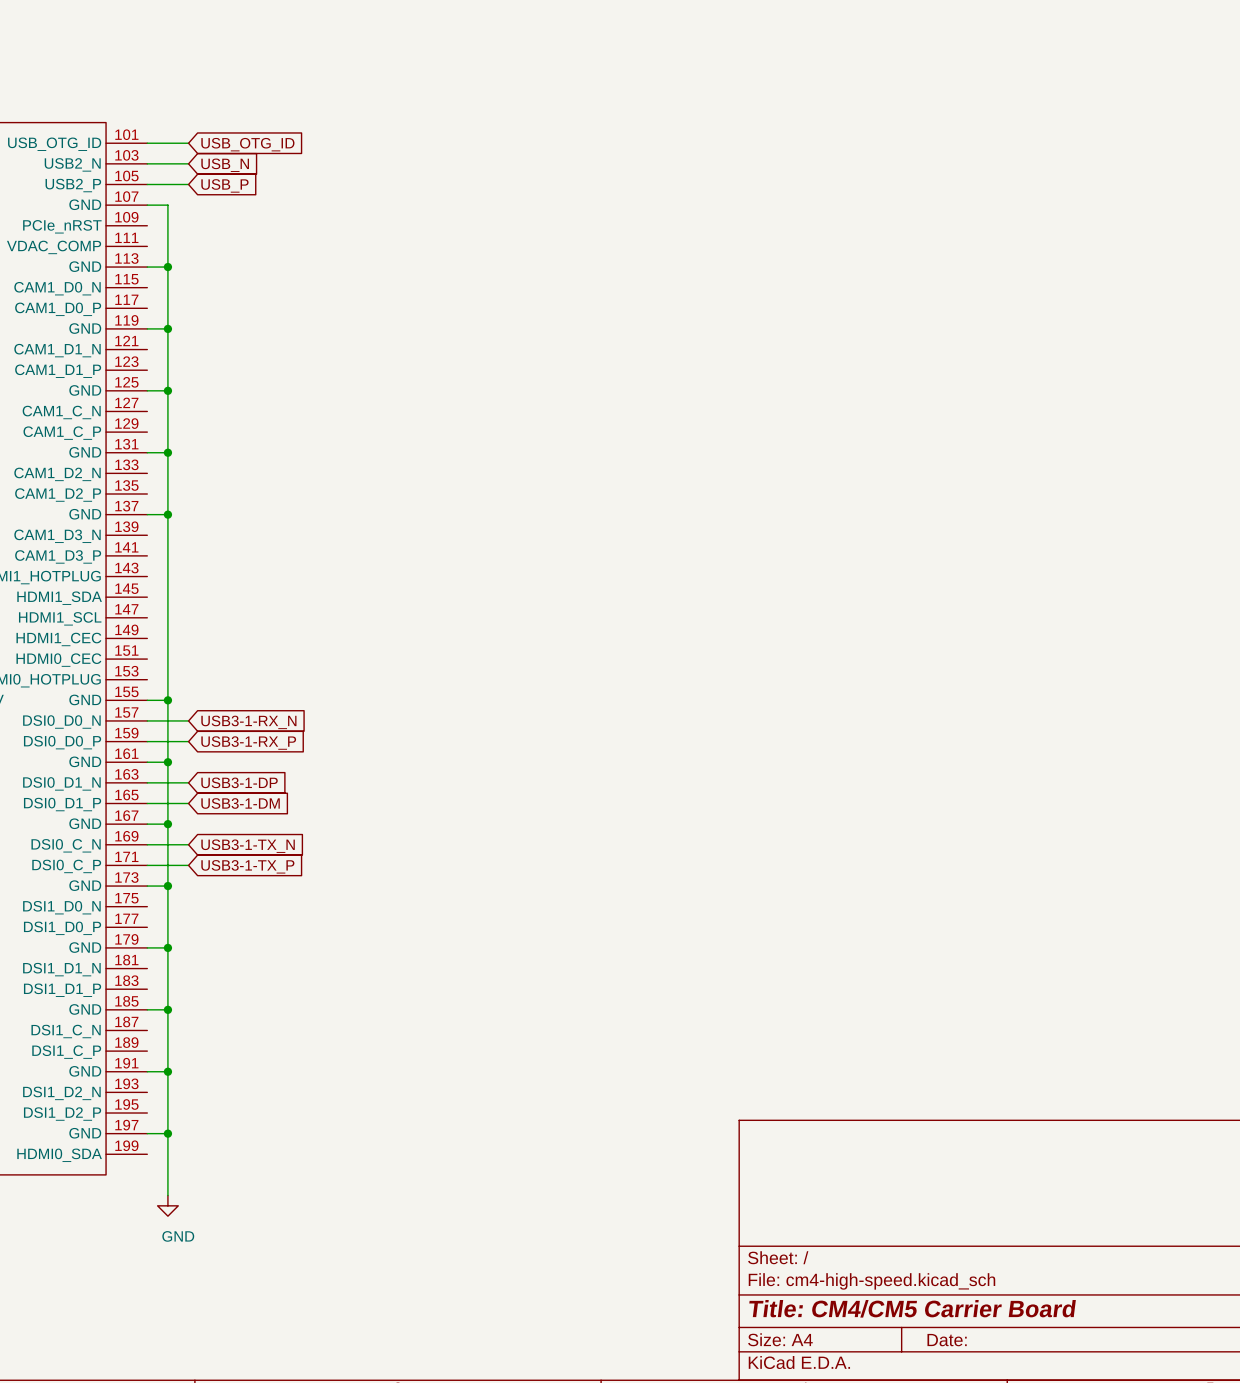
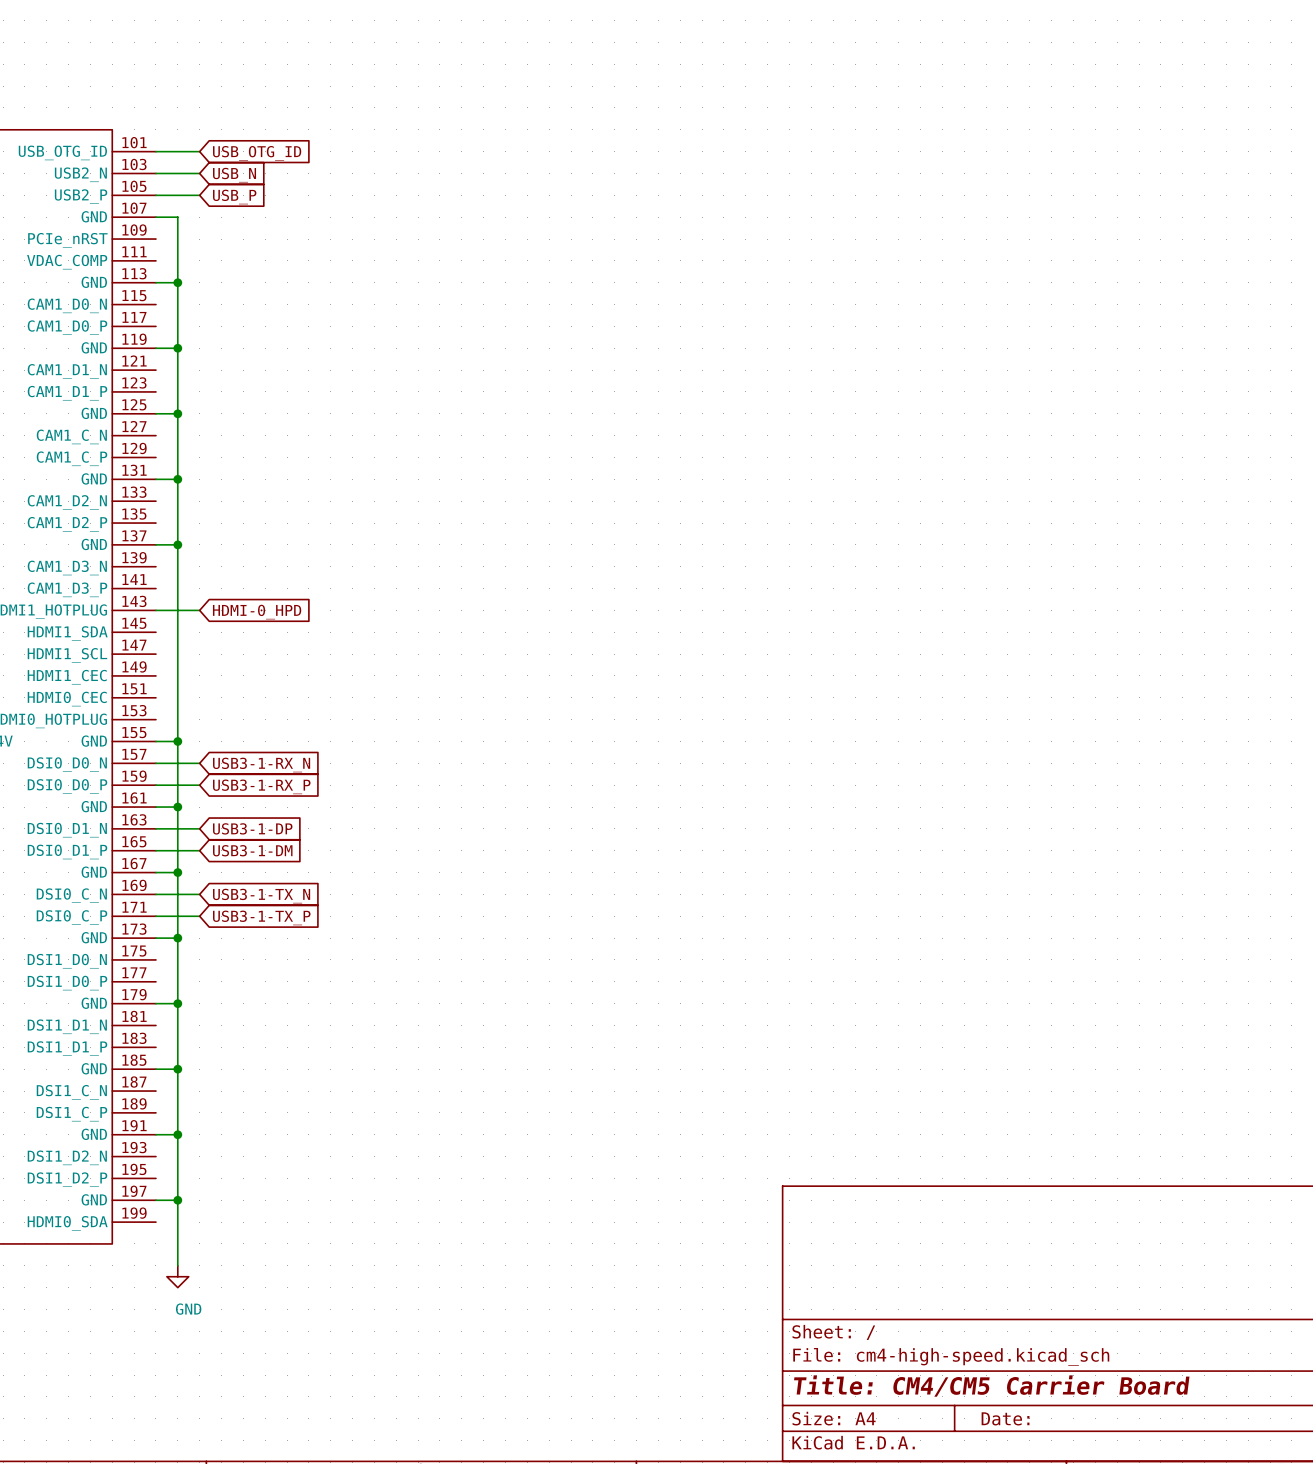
wire: none -> (155, 610) (199, 610)
global label: none -> HDMI-0_HPD (257, 612)

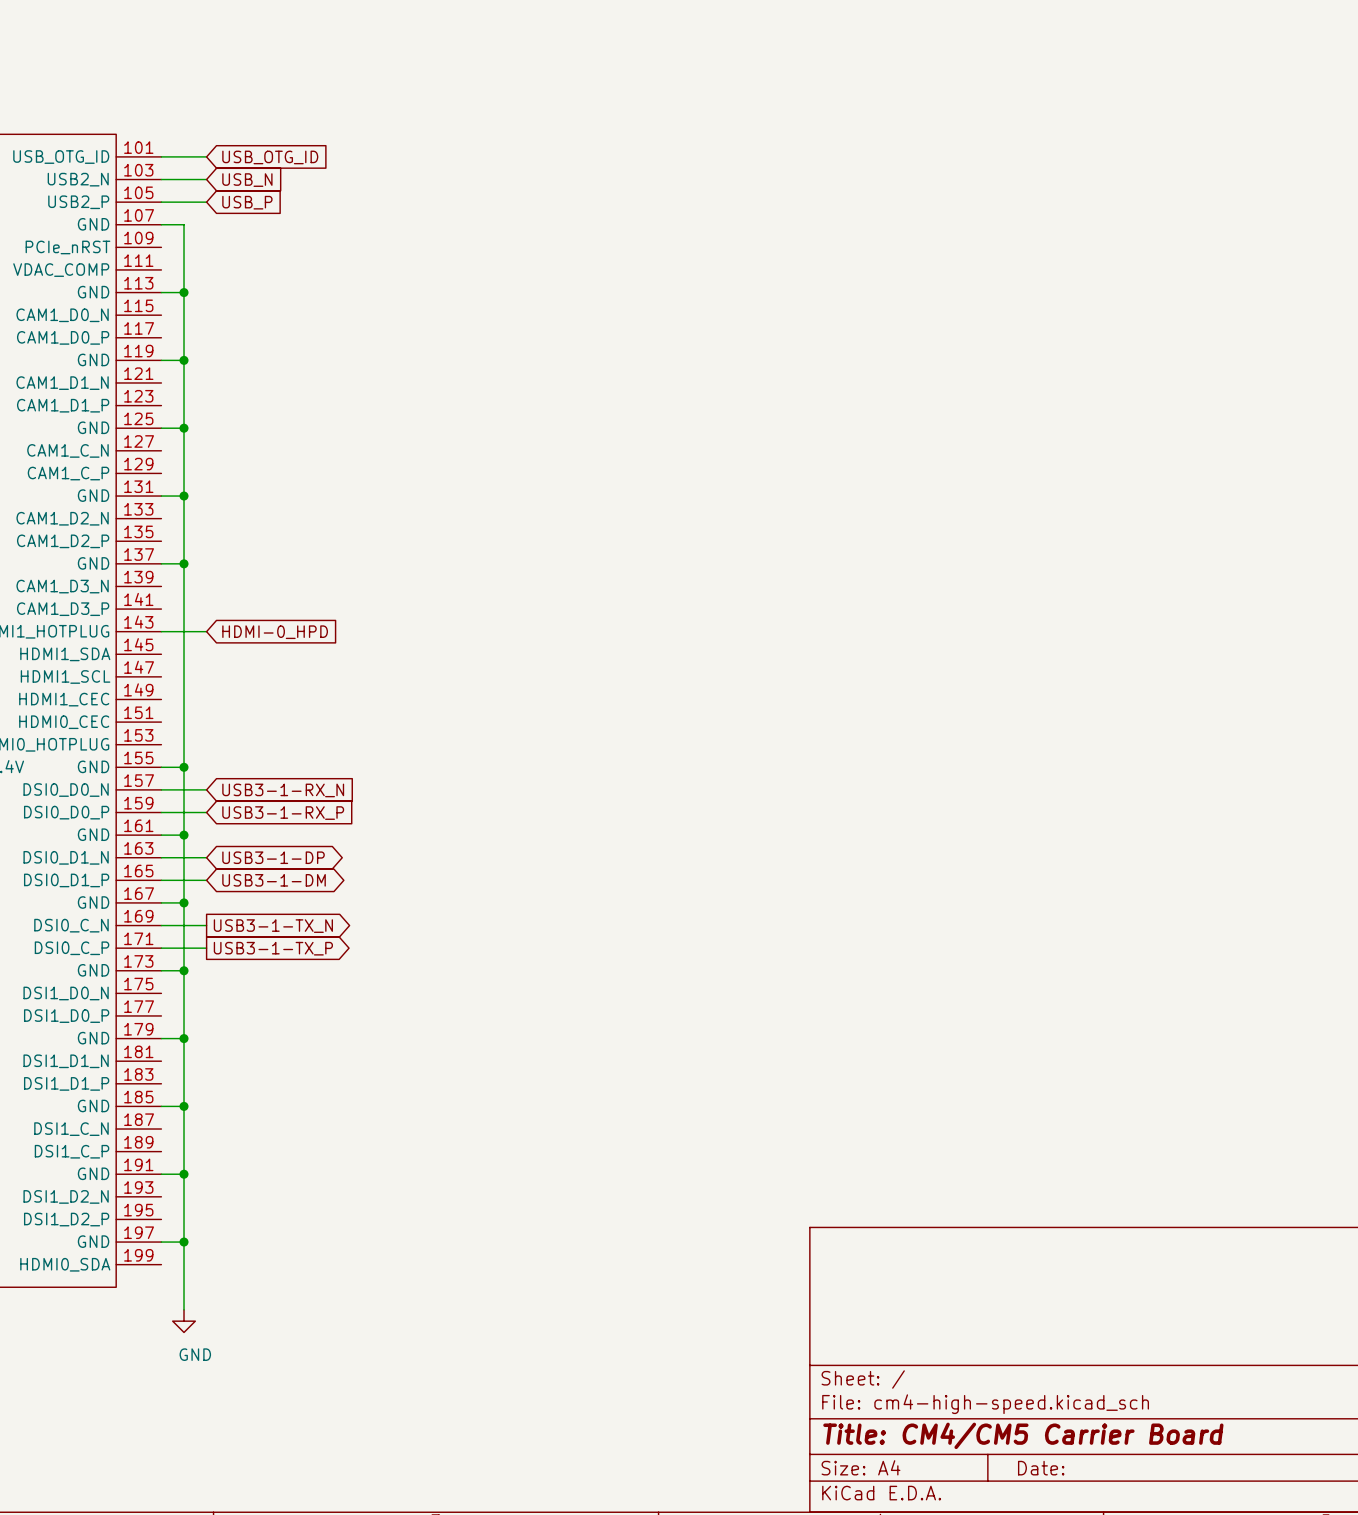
global label shape: input (252, 828) -> bidirectional (273, 857)
global label shape: input (252, 850) -> bidirectional (274, 880)
global label shape: input (261, 896) -> output (273, 926)
global label shape: input (261, 917) -> output (273, 948)

